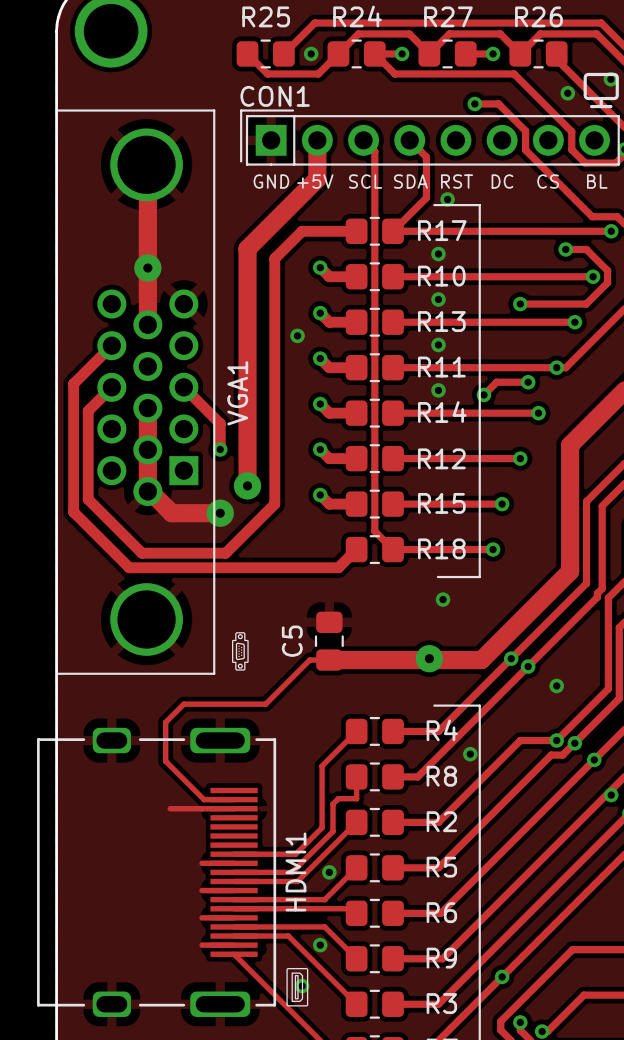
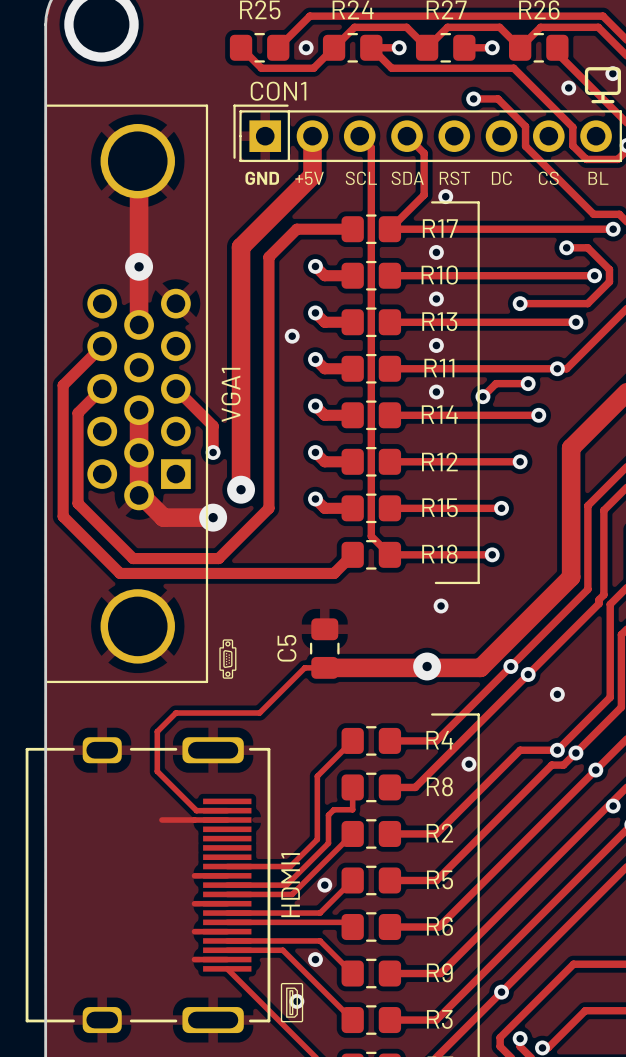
VGA1 footprint: [56, 109, 249, 675] -> [45, 104, 237, 684]

